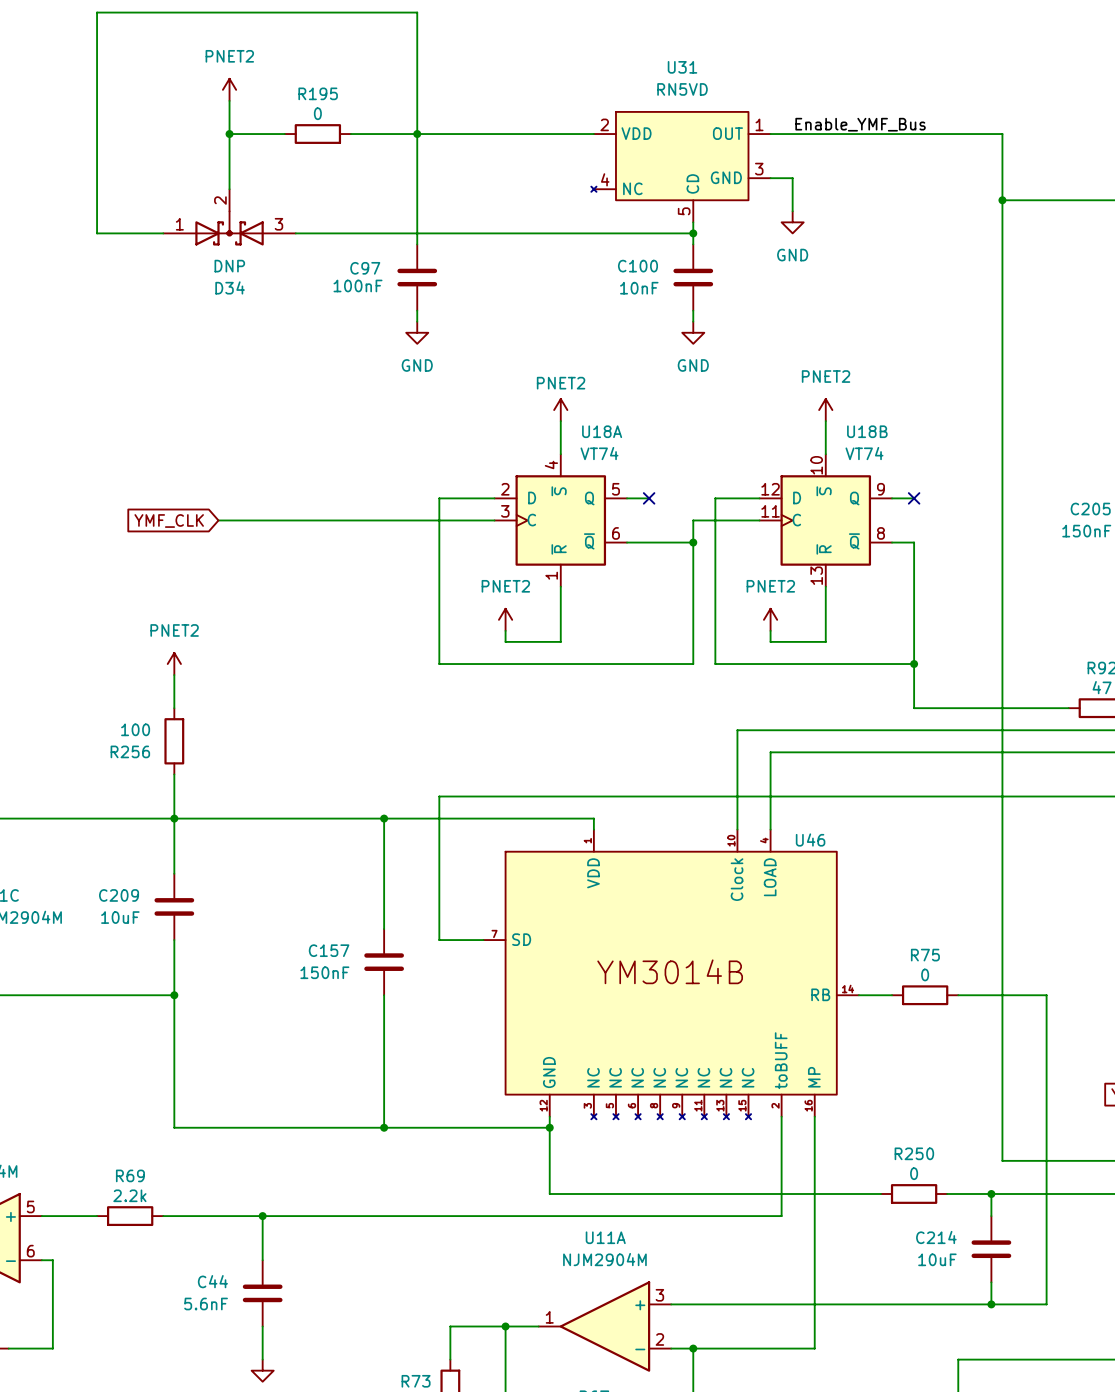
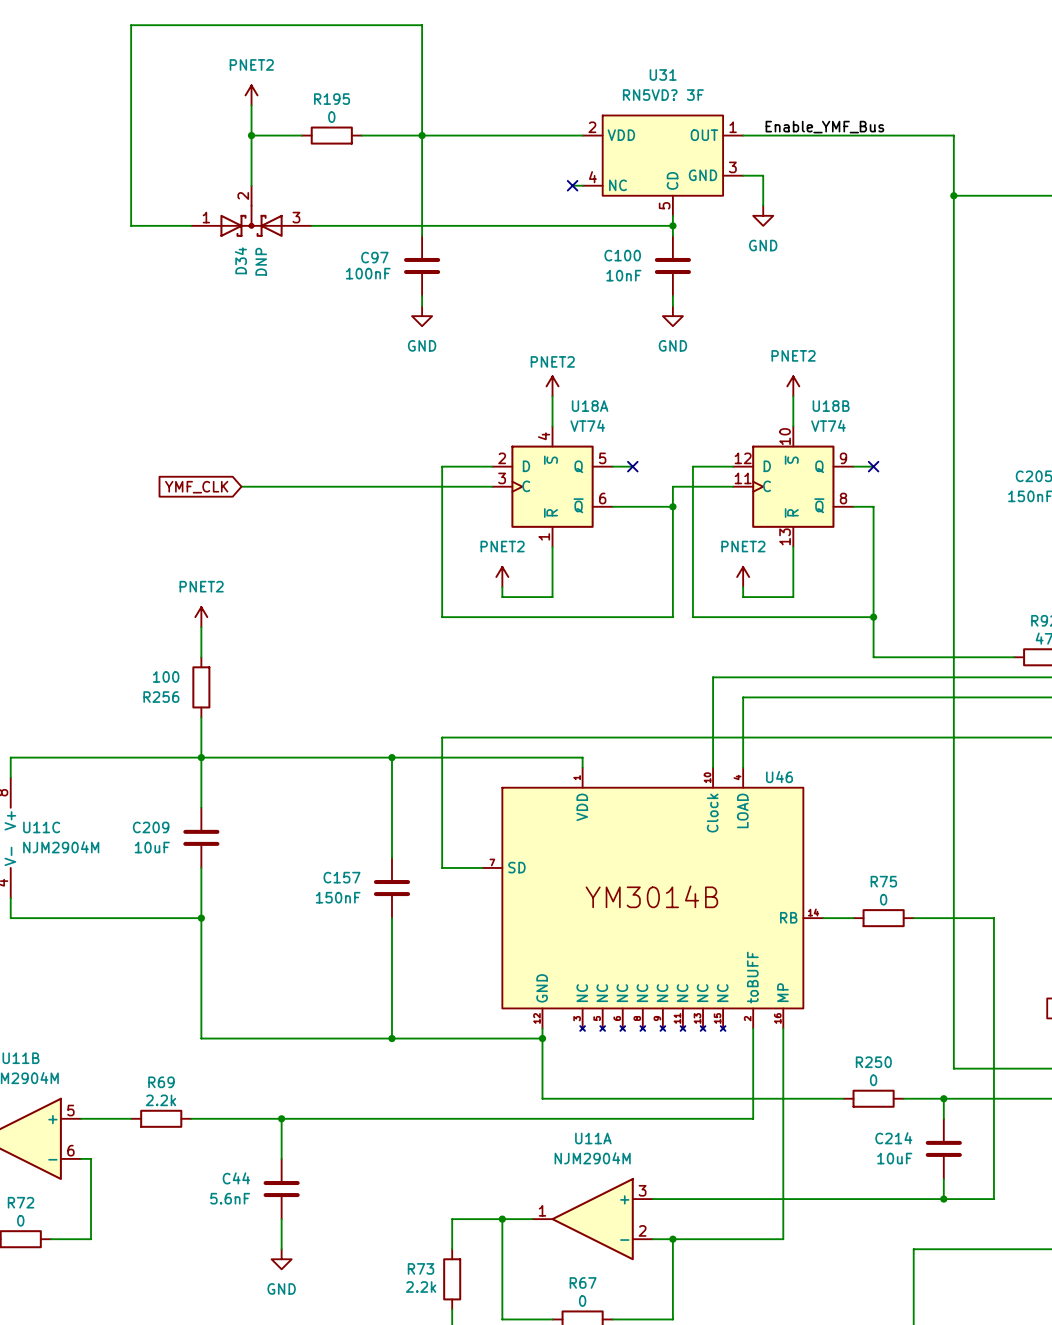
U31 value: RN5VD (682, 89) -> RN5VD? 3F (663, 95)
U31 symbol: [591, 111, 771, 223] -> [582, 115, 744, 216]
wire: none -> (572, 185) (582, 185)
no-connect mark: none -> (572, 185)
D34 value rotation: 0° (229, 266) -> 90° counterclockwise (261, 261)
D34 name rotation: 0° (230, 287) -> 90° counterclockwise (240, 260)

